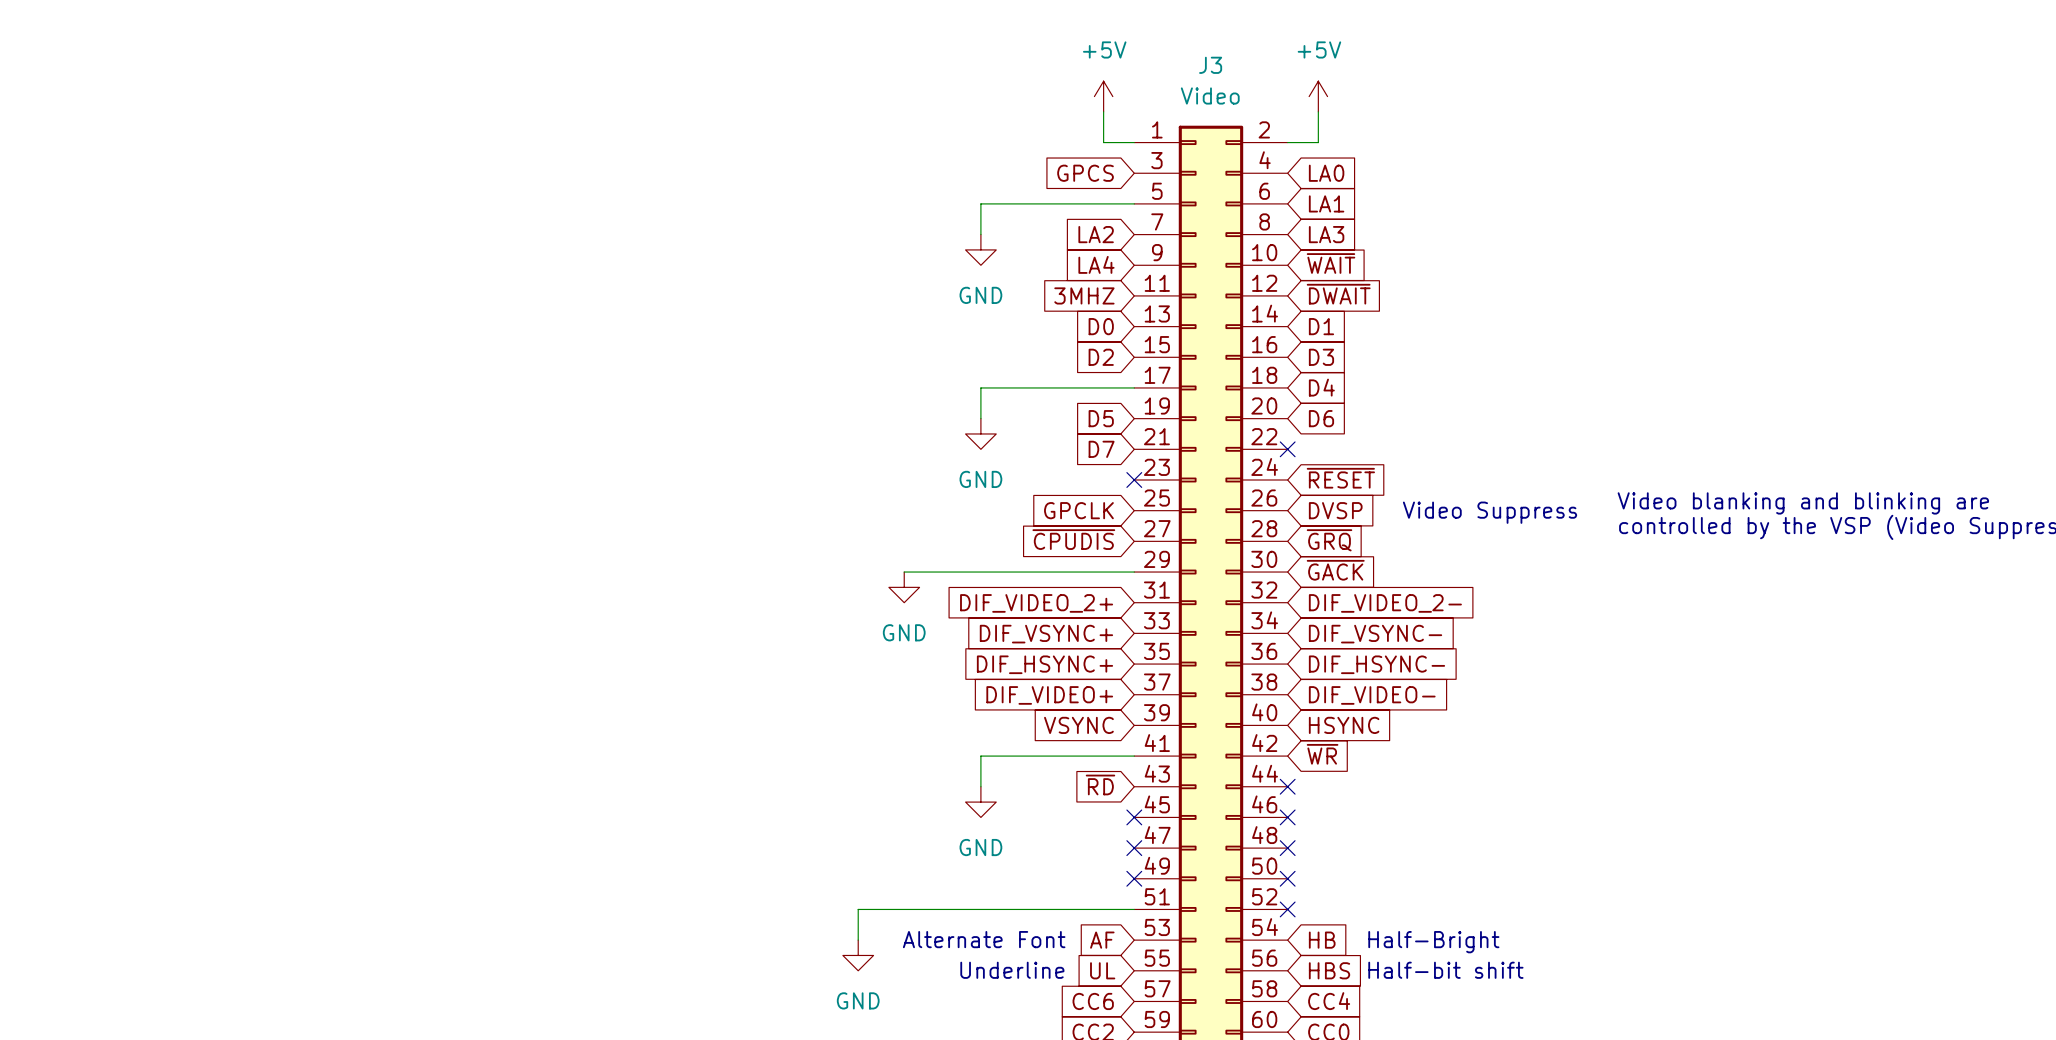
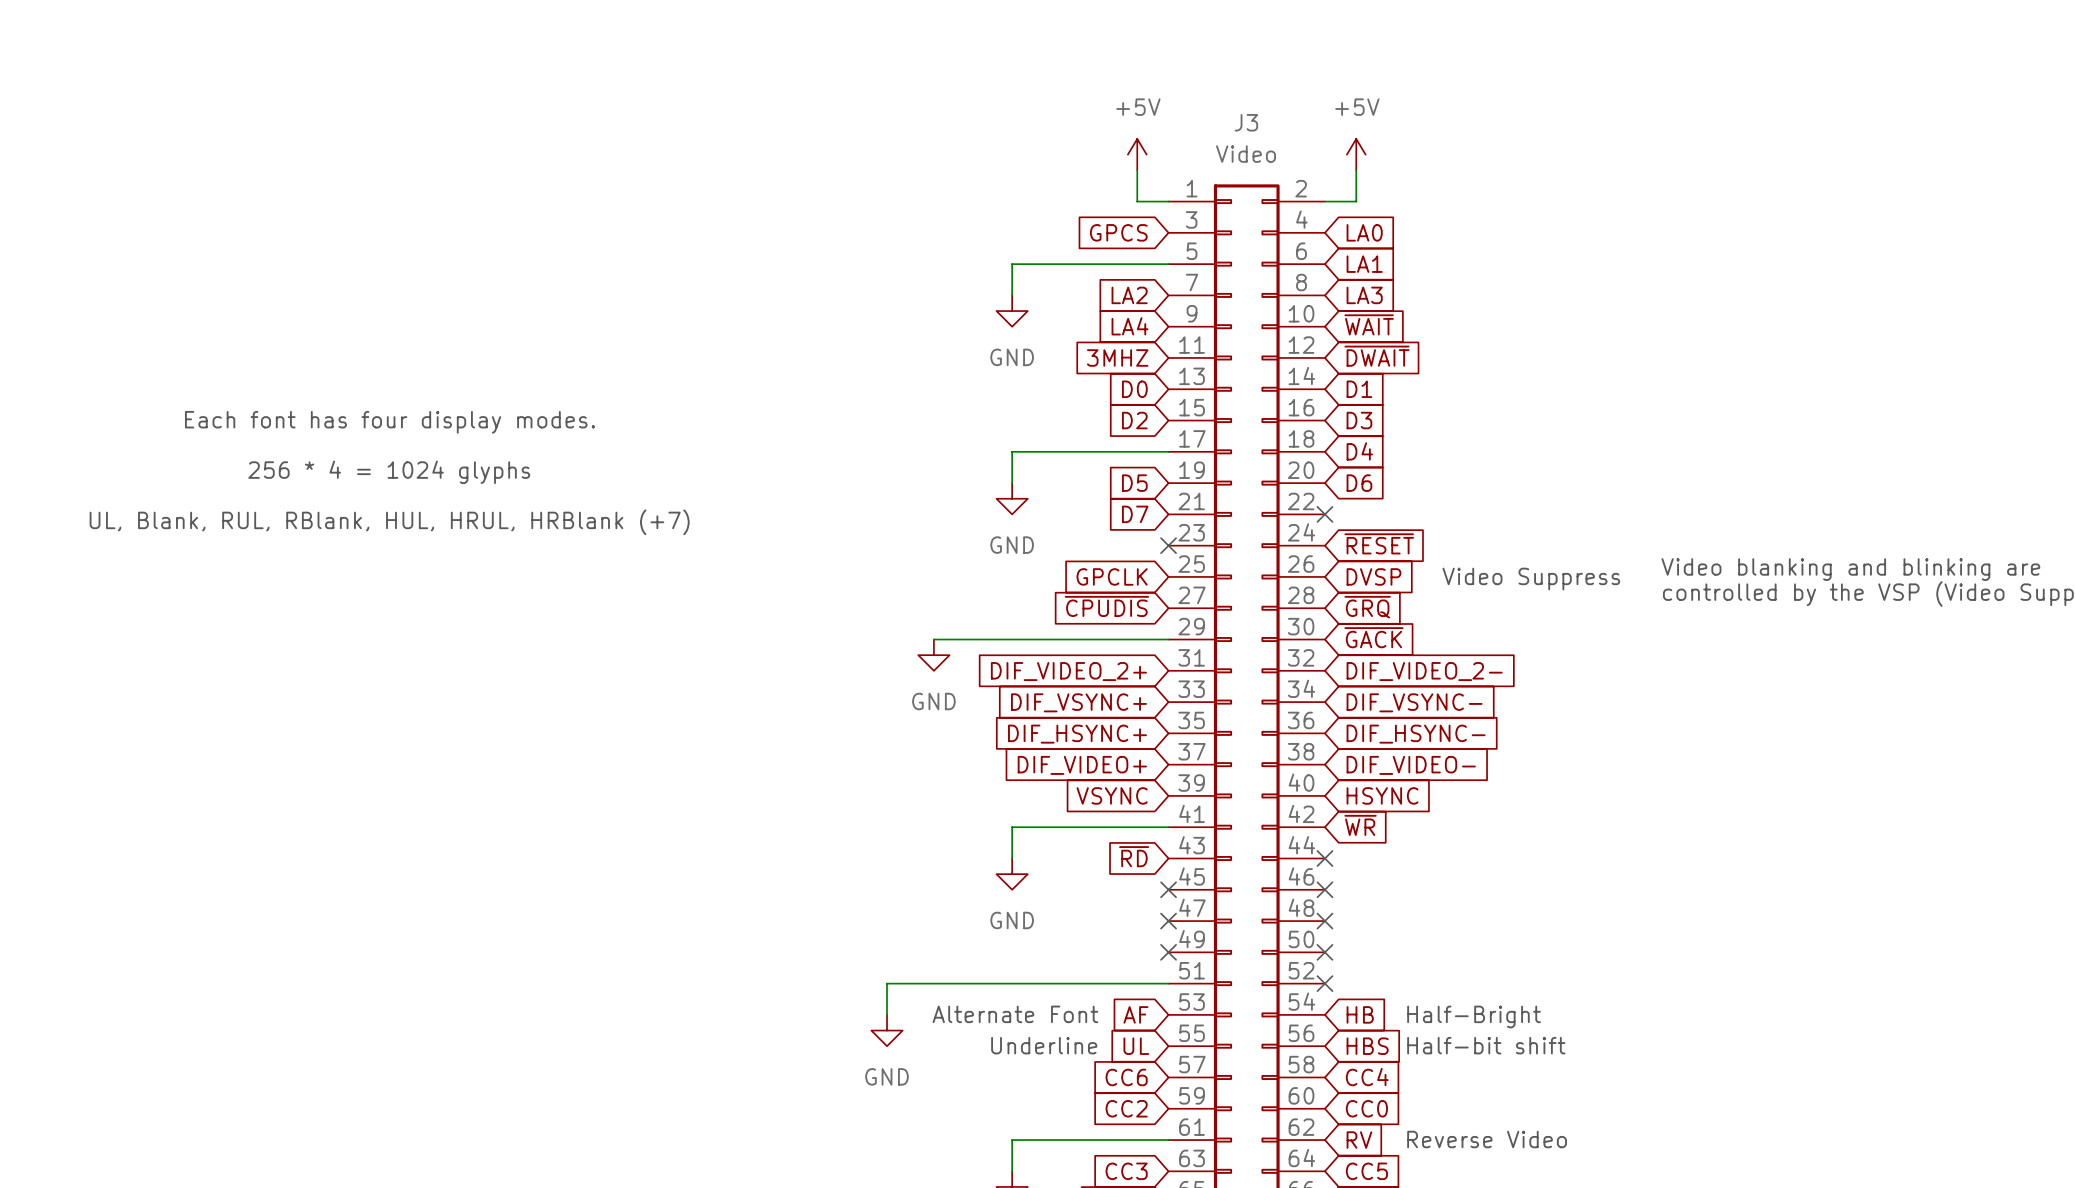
text: none -> Each font has four display modes. (389, 422)
text: none -> 256 * 4 = 1024 glyphs (389, 472)
text: none -> UL, Blank, RUL, RBlank, HUL, HRUL, HRBlank (+7) (389, 522)

